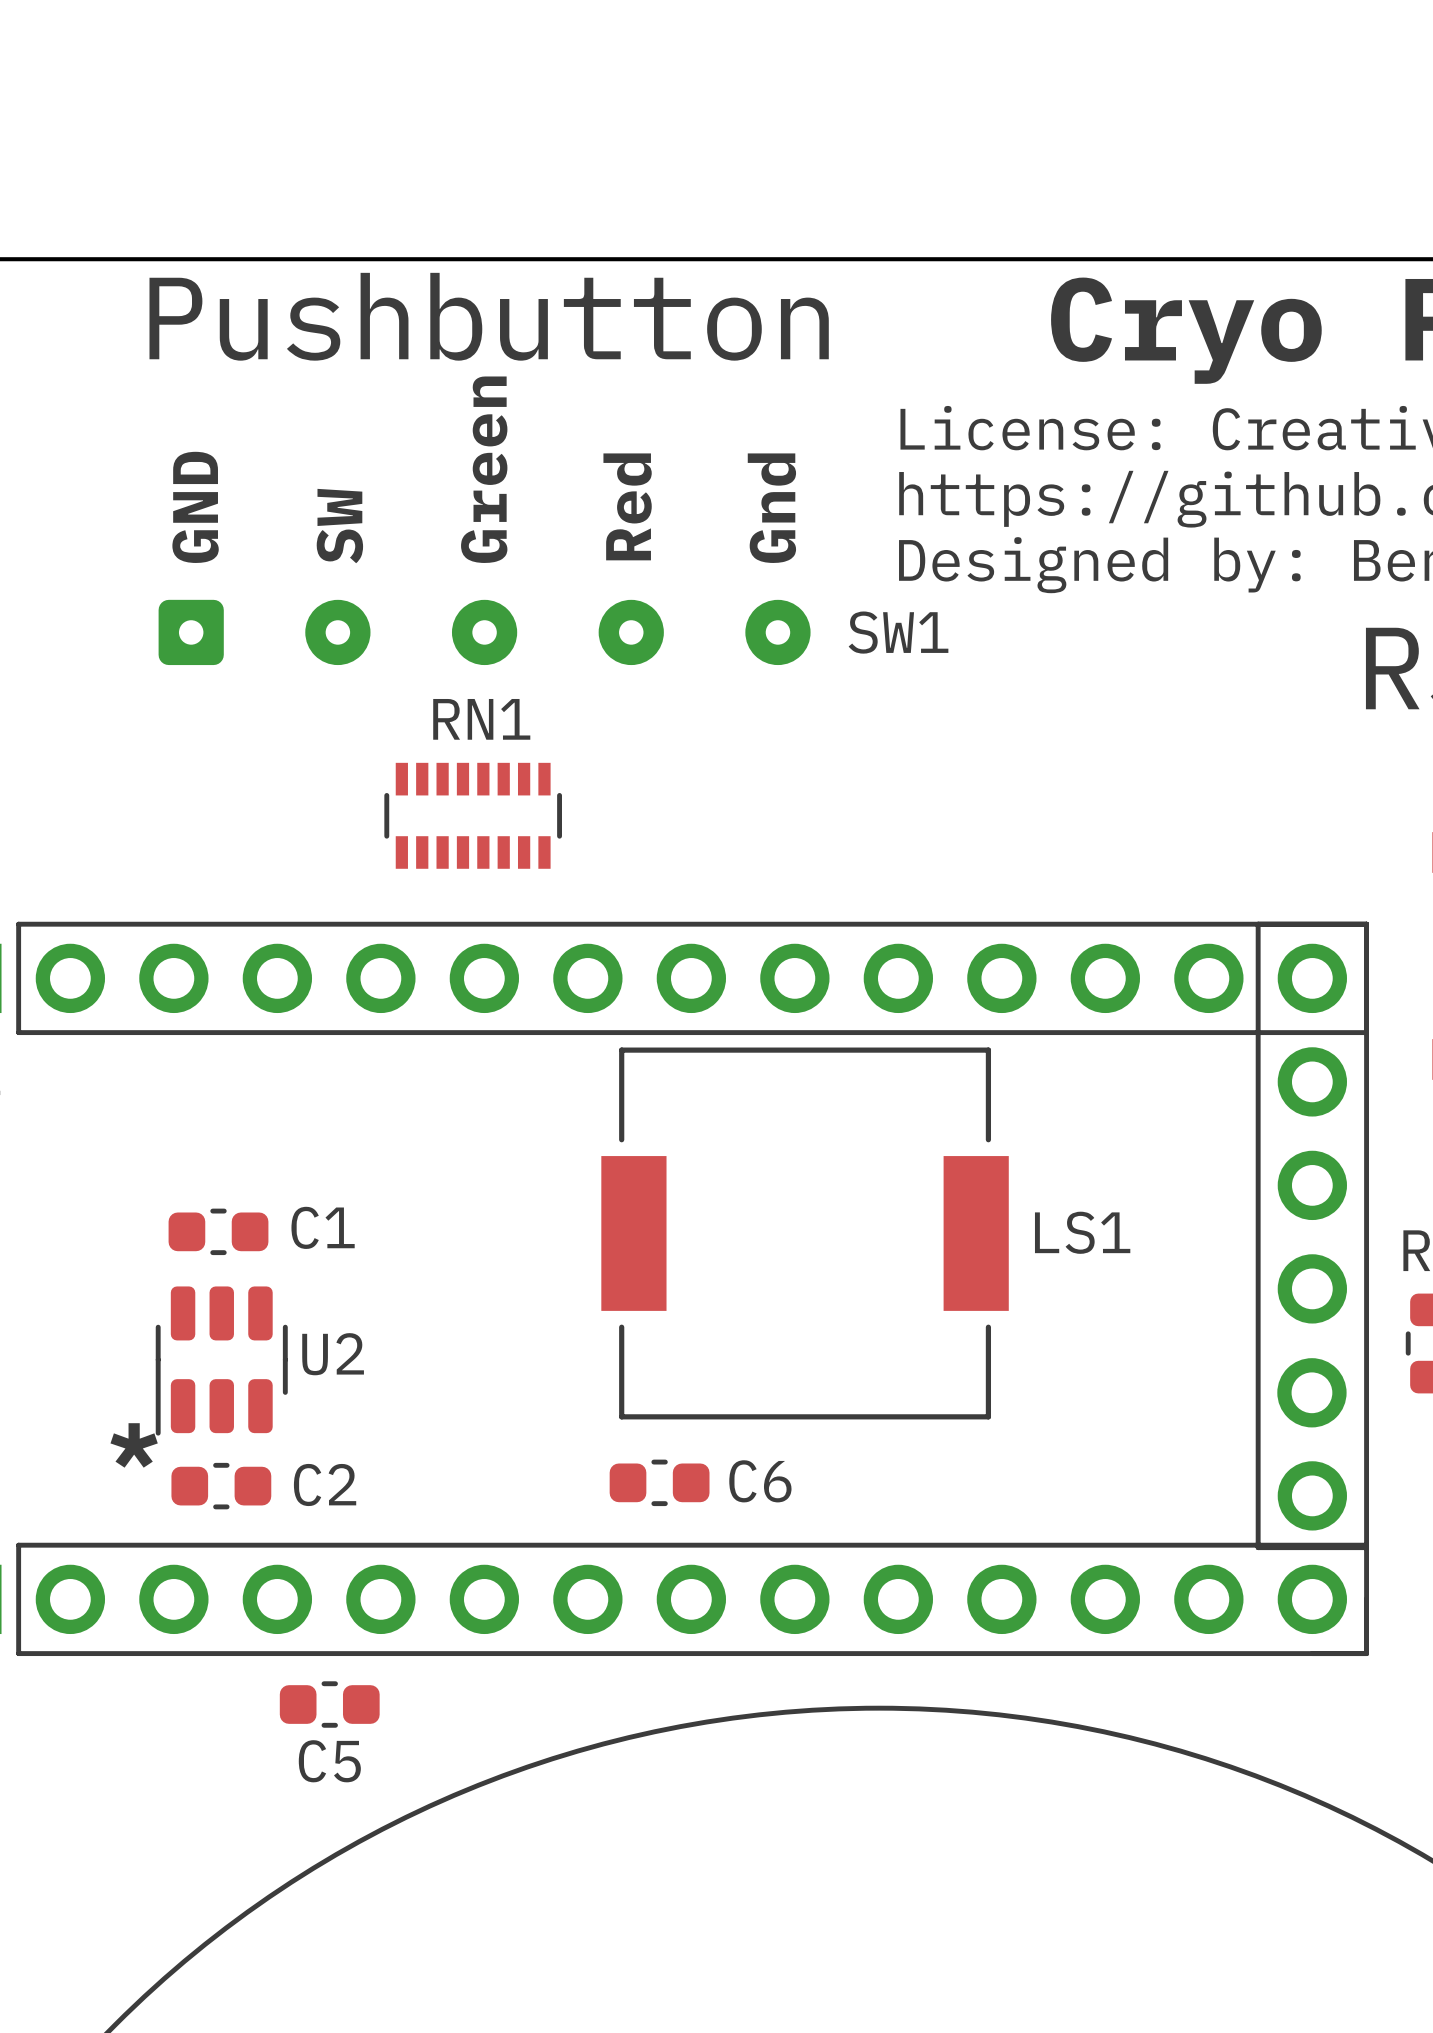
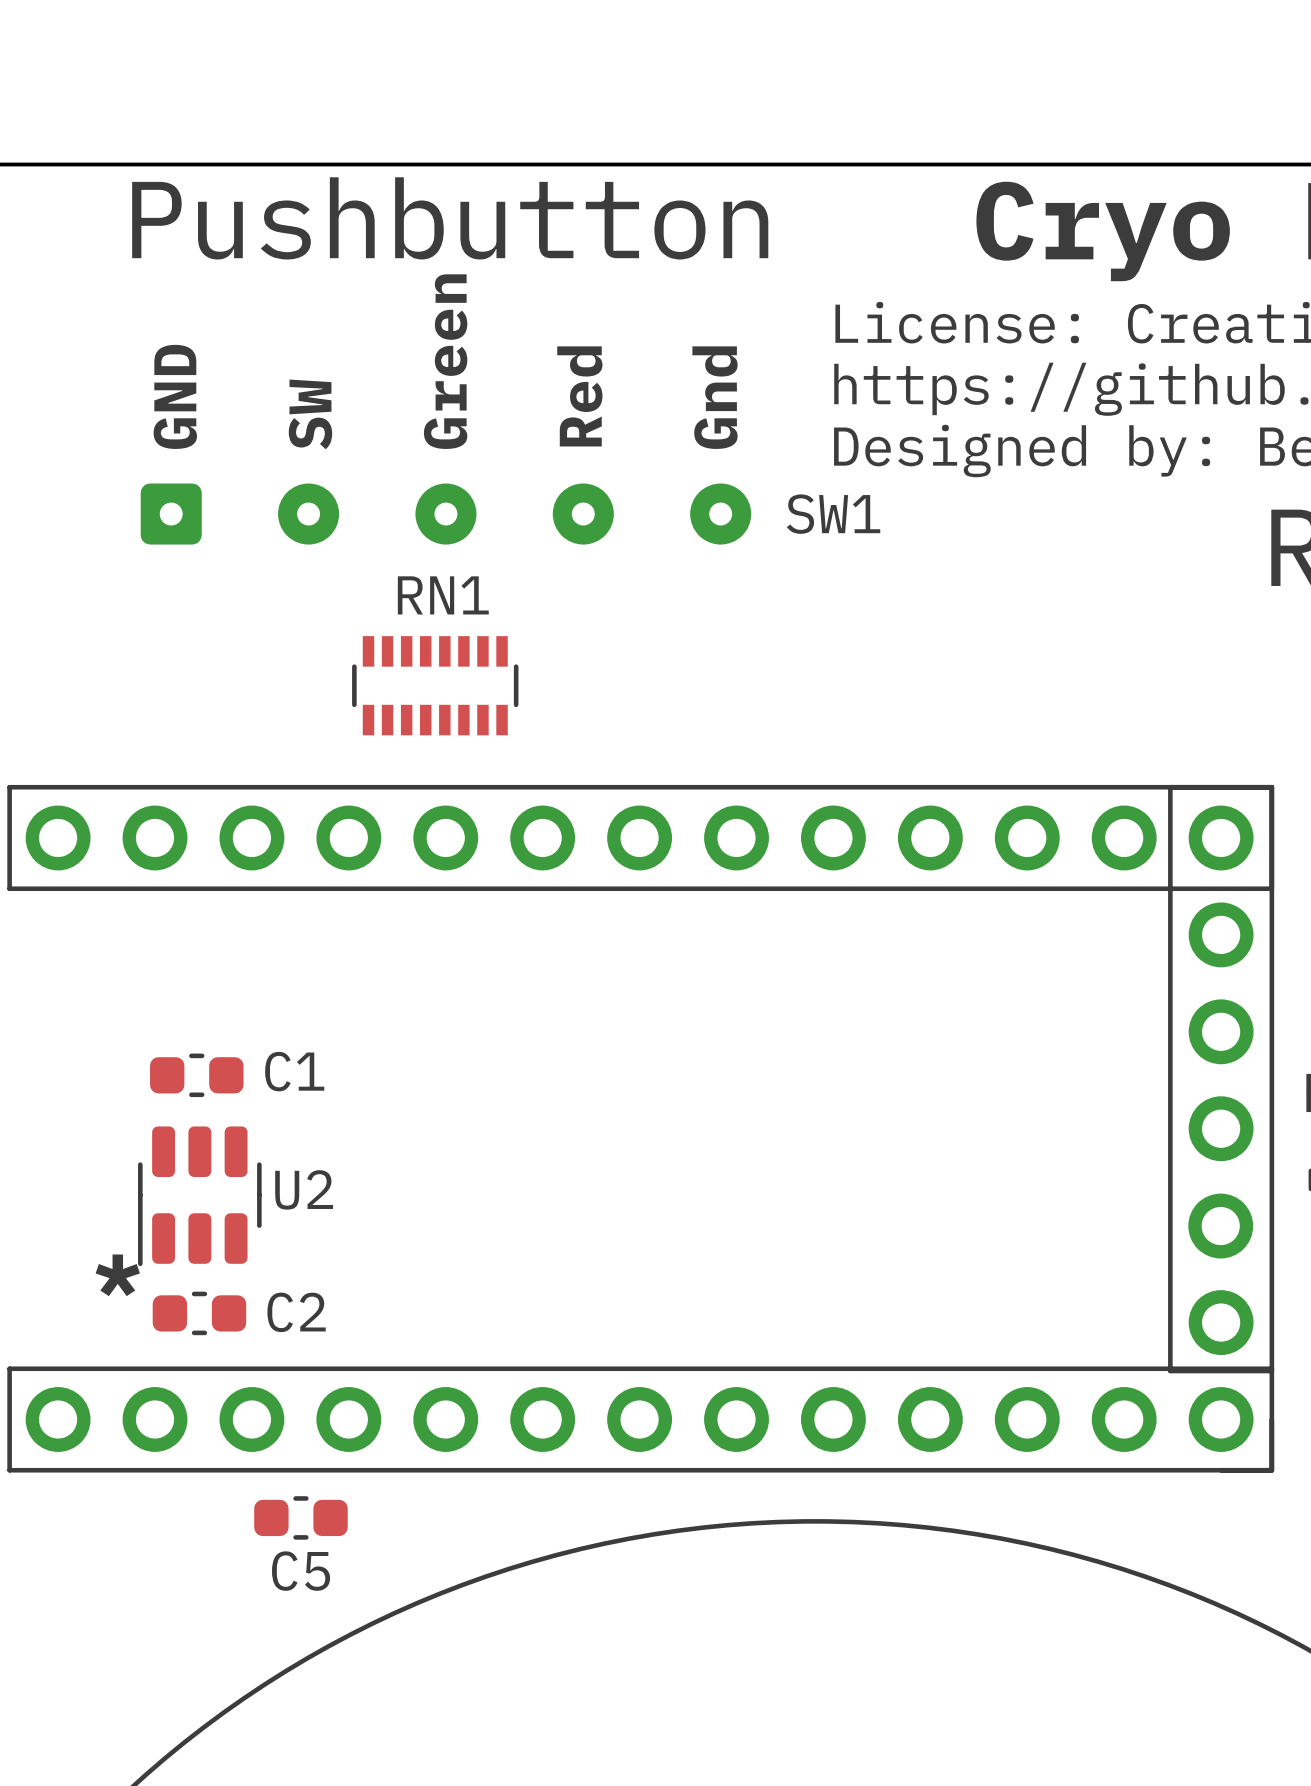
LS1: (805, 1233) -> none
C6: (659, 1482) -> none

